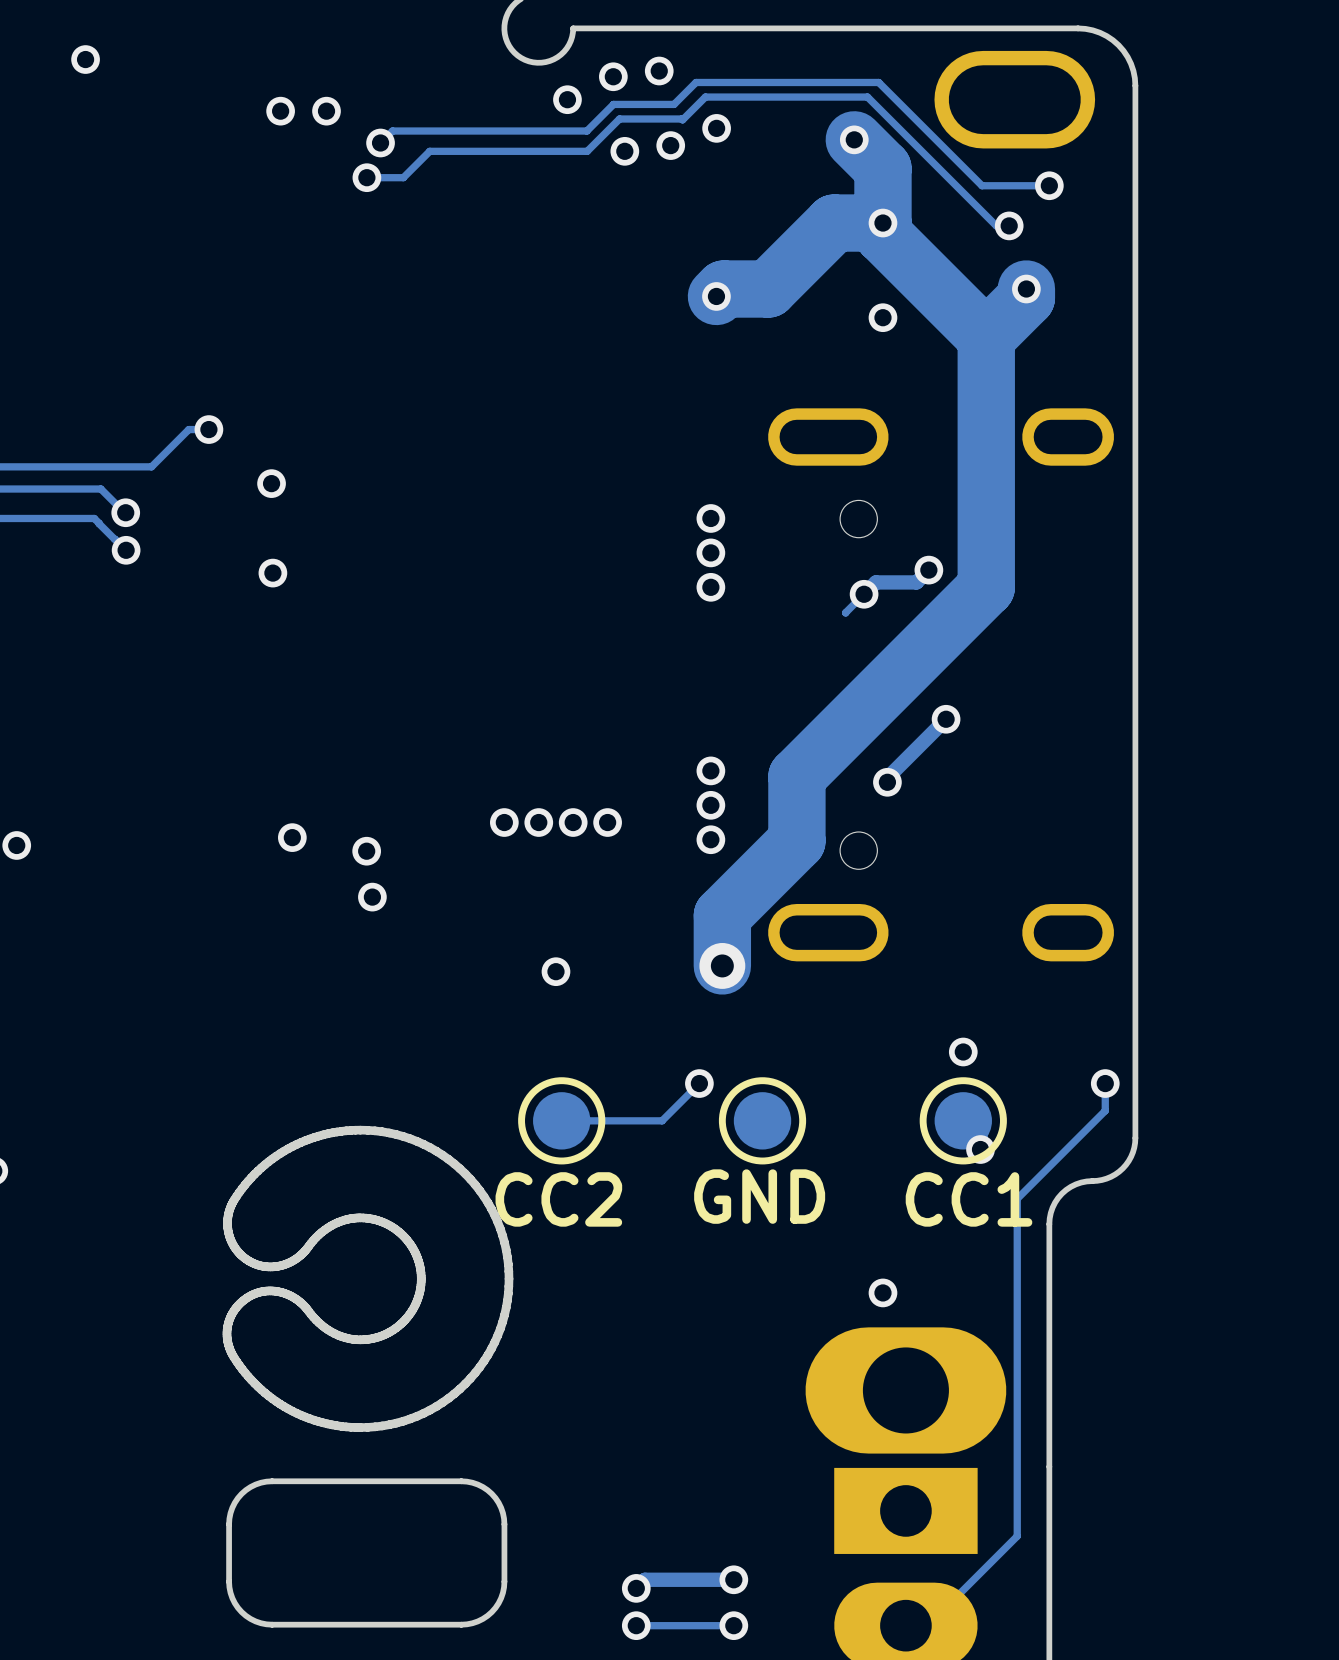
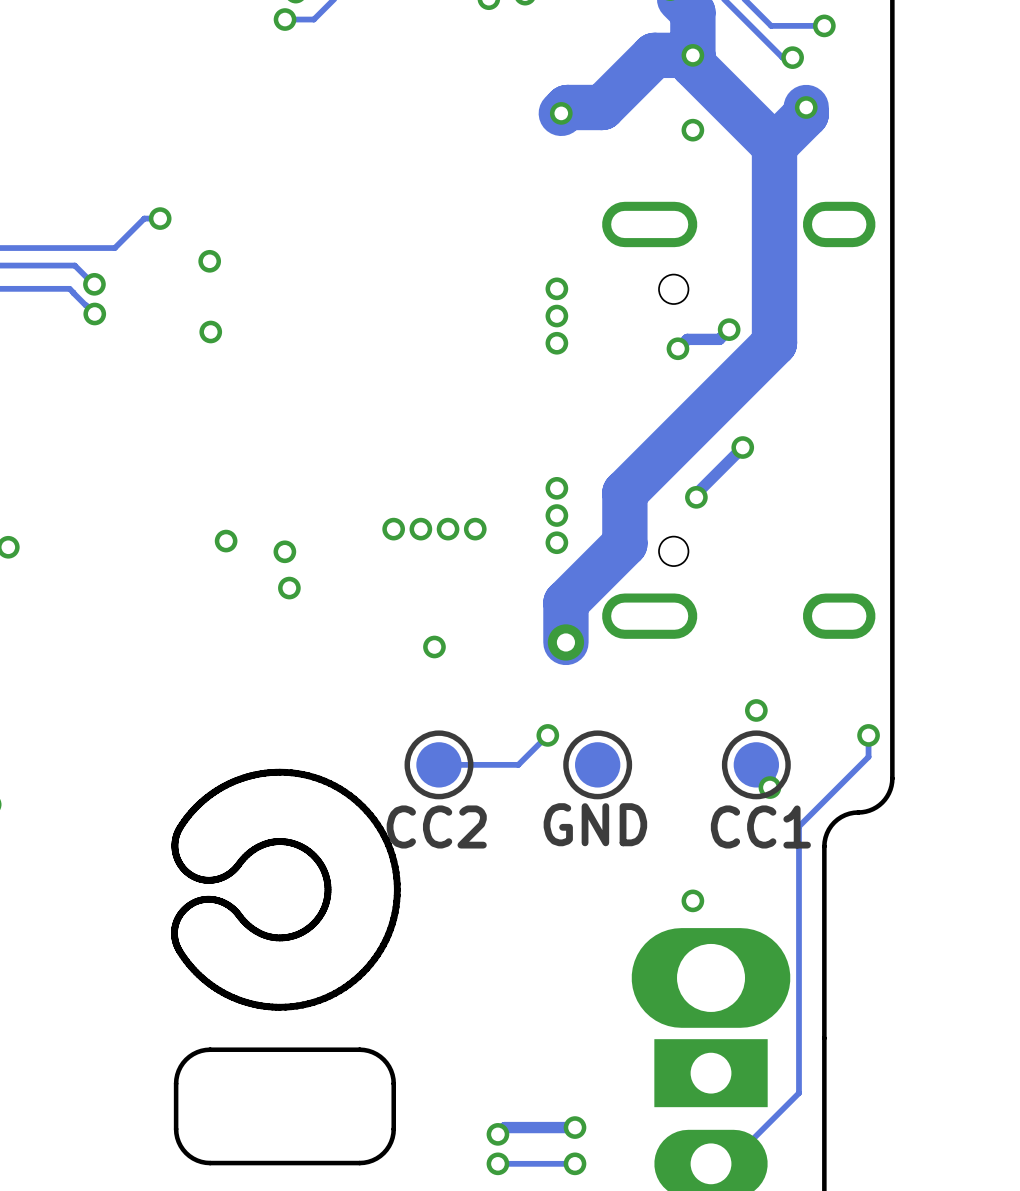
track: (864, 594) (845, 612) -> none

